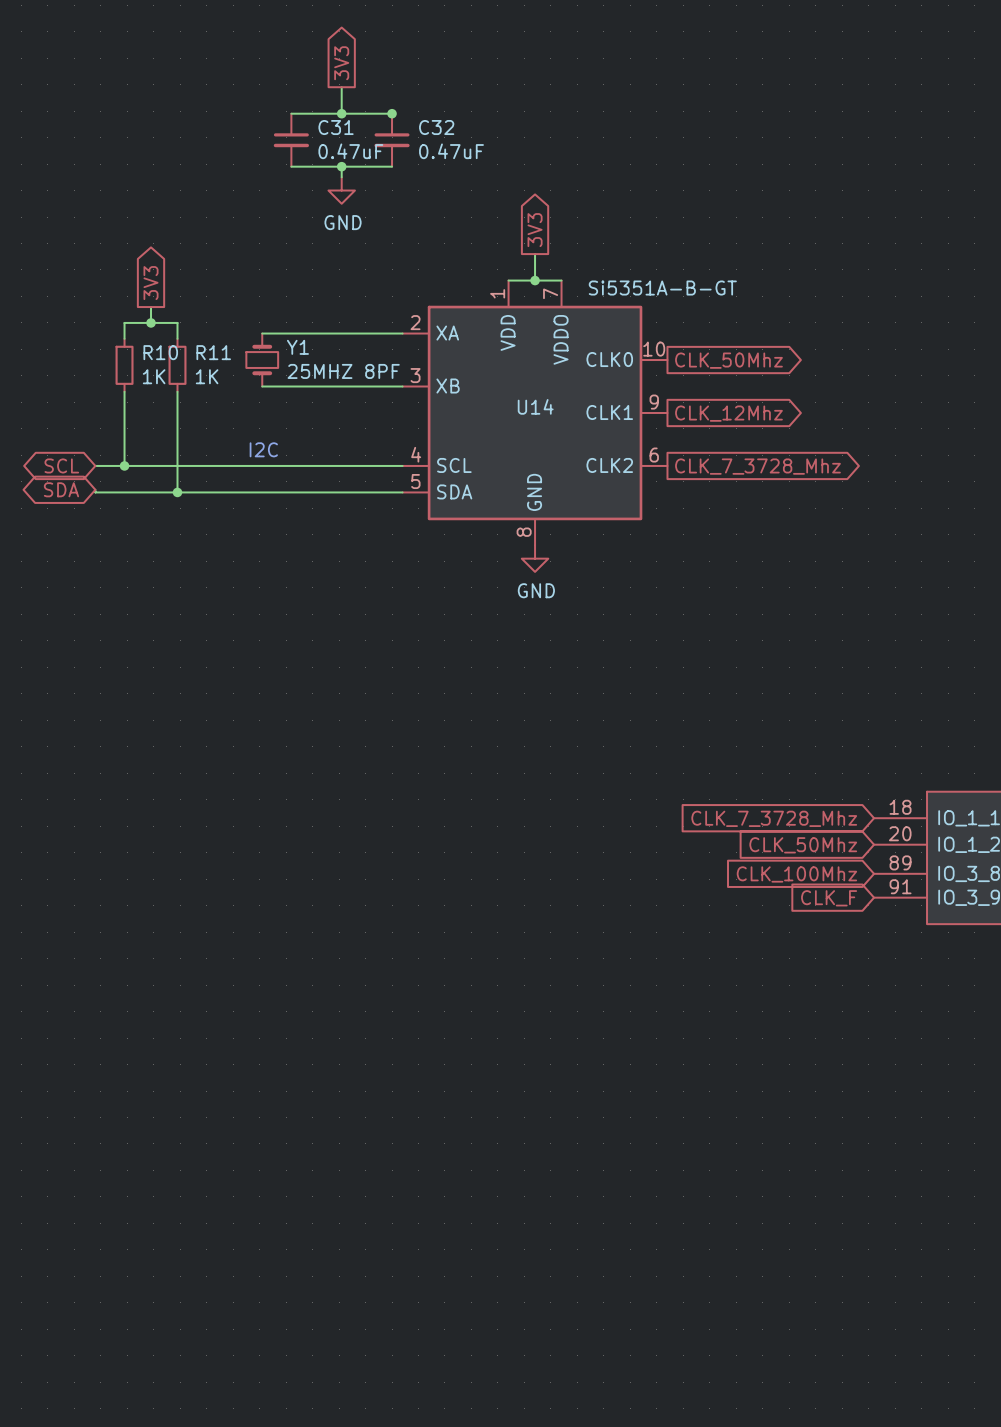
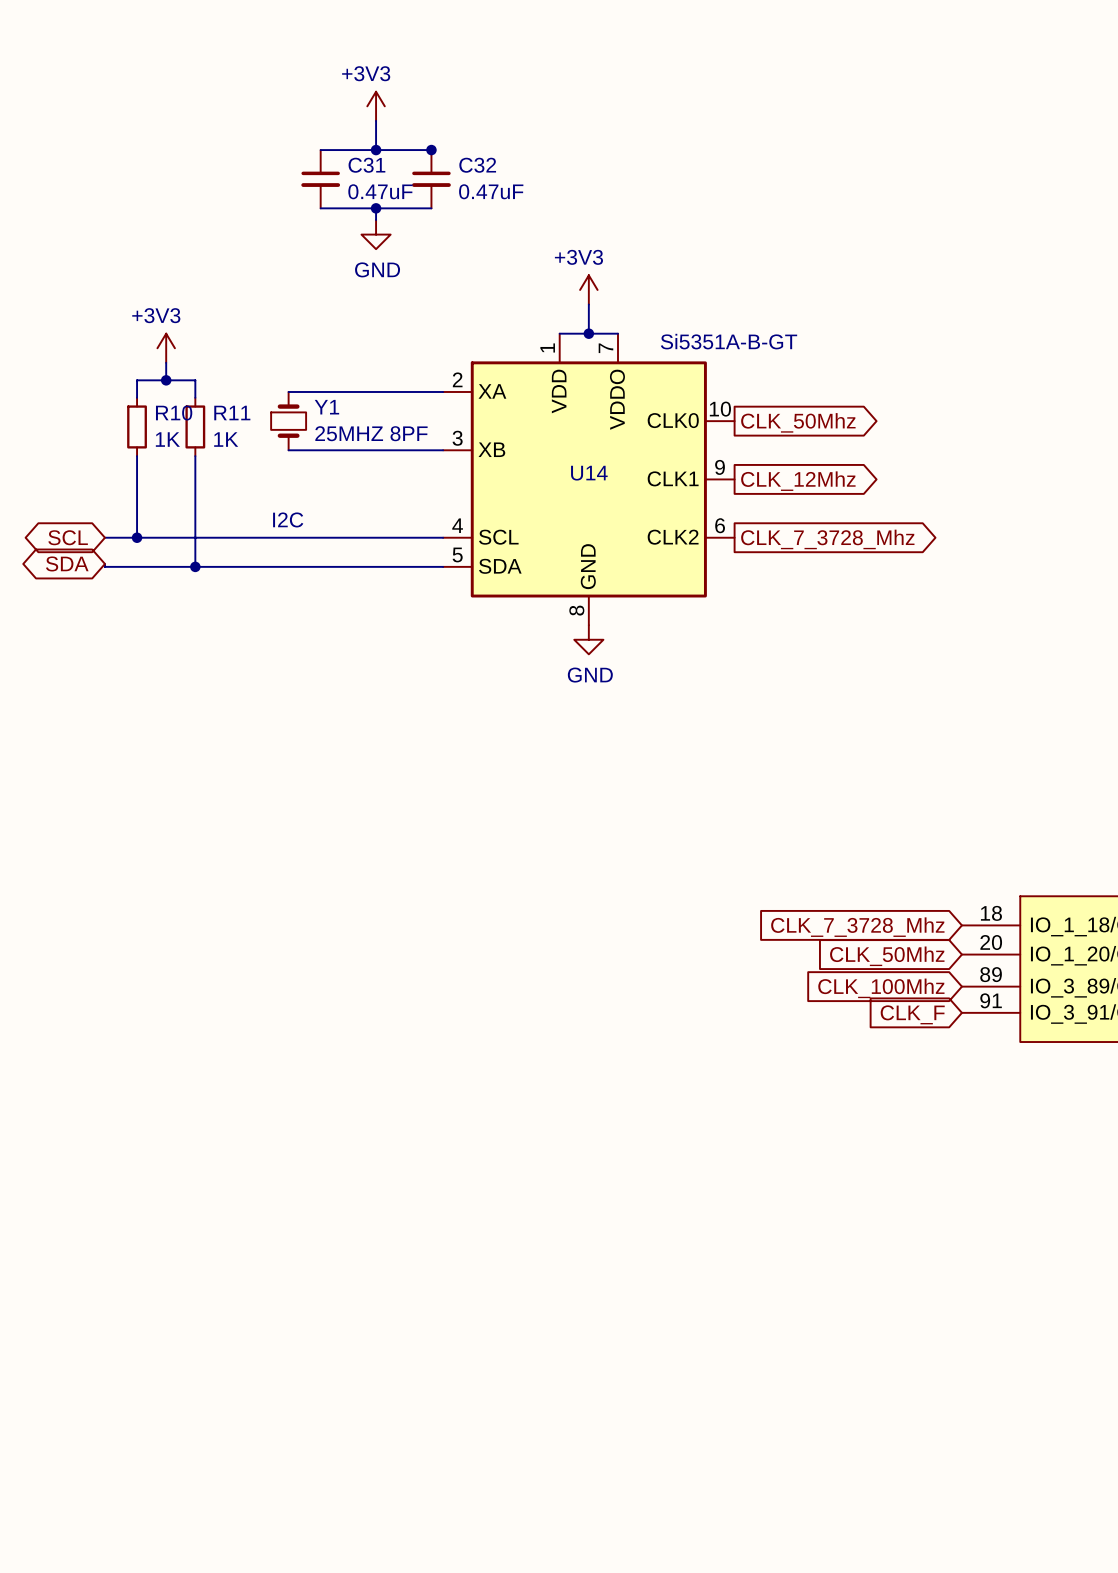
global label: 3V3 (341, 63) -> none
power symbol: none -> +3V3 (376, 106)
global label: 3V3 (535, 230) -> none
power symbol: none -> +3V3 (588, 289)
global label: 3V3 (151, 283) -> none
power symbol: none -> +3V3 (166, 348)

